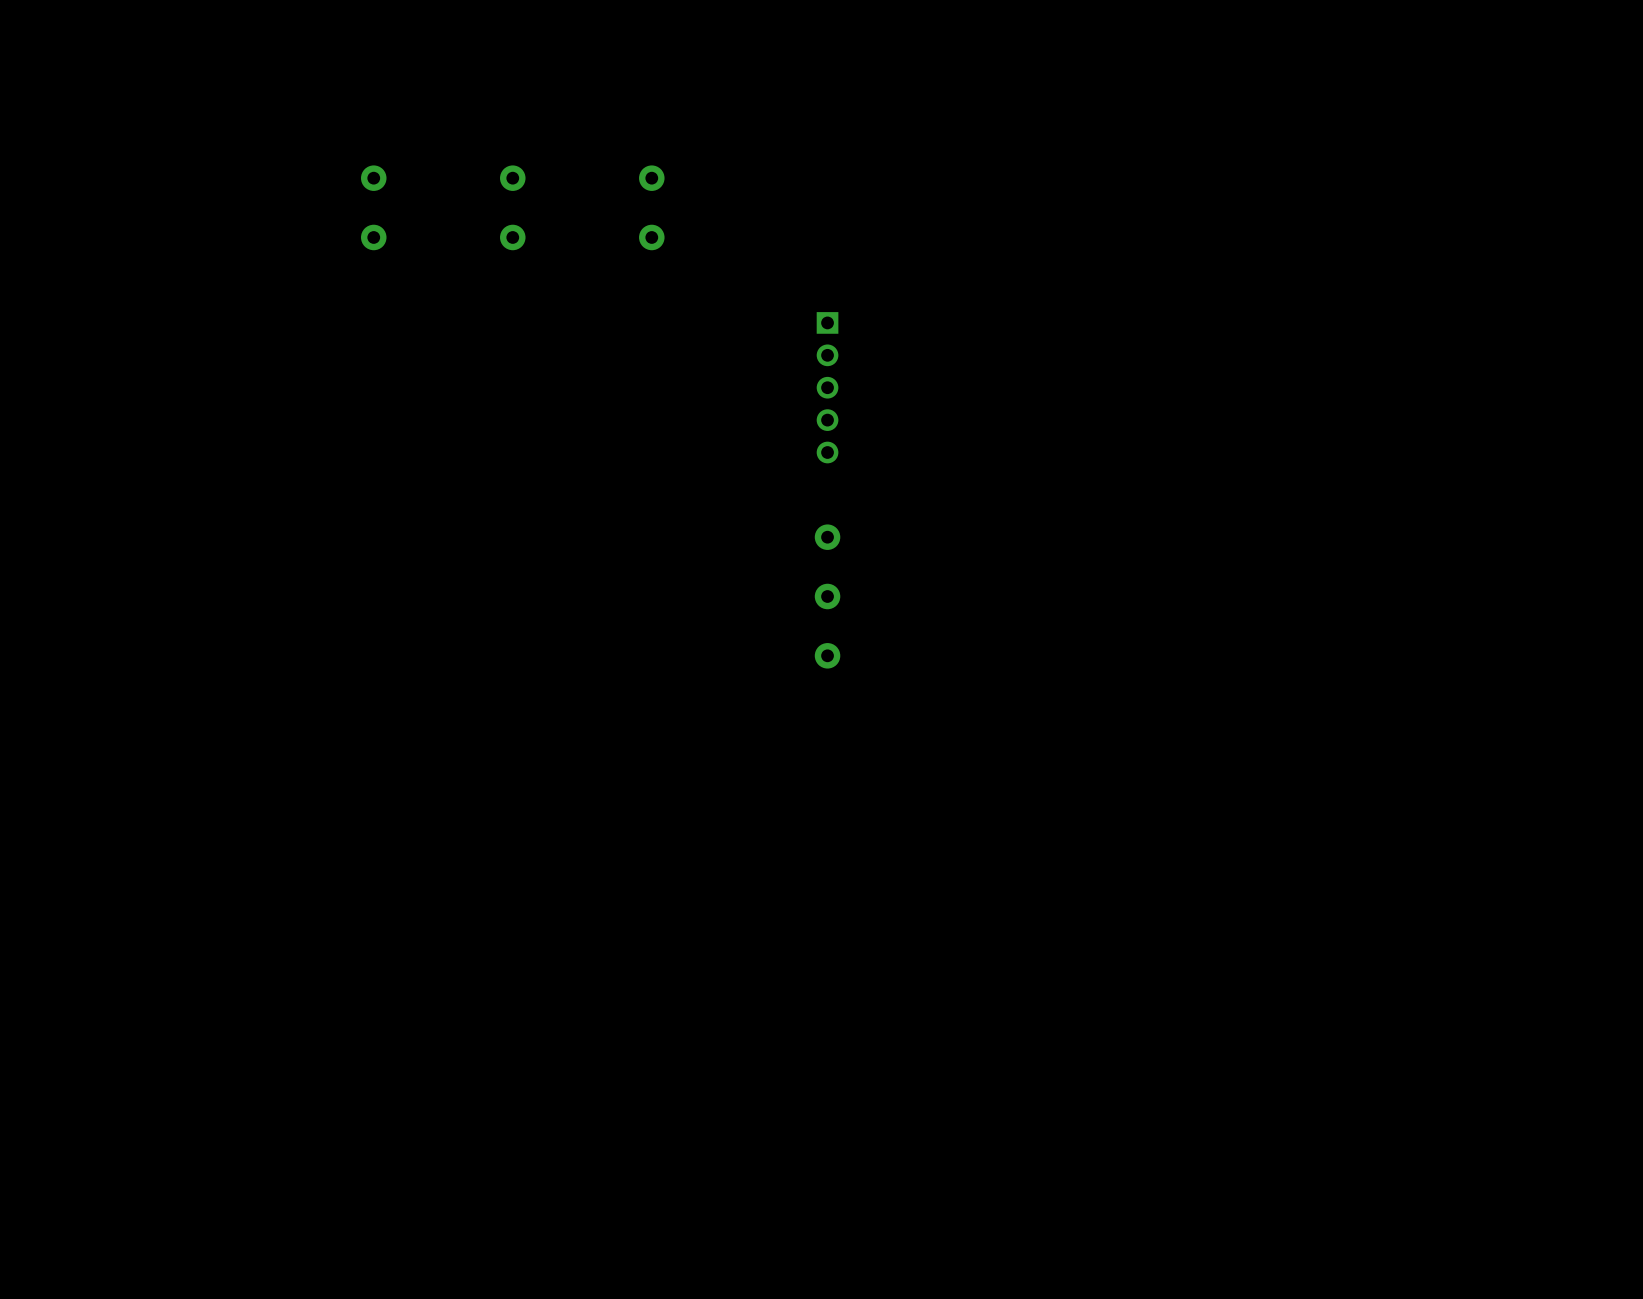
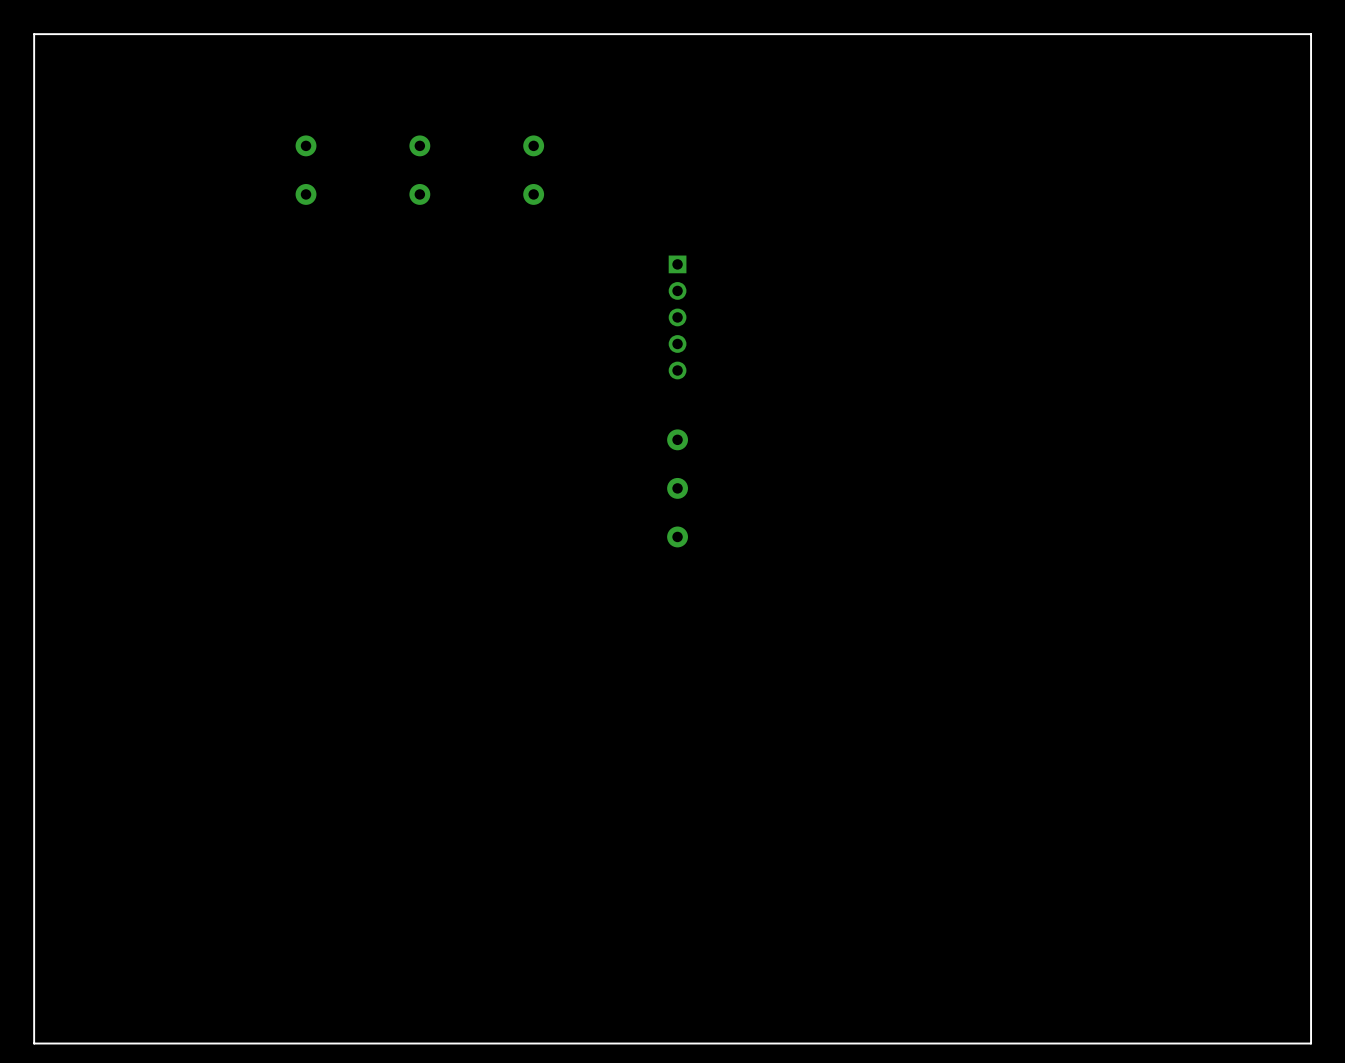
board edge: none -> (1311, 34) (34, 34) (34, 1043) (1311, 1043) (1311, 34)

